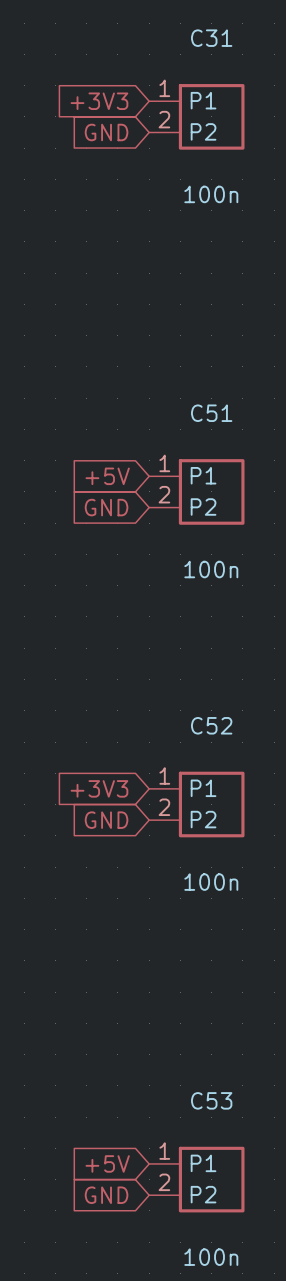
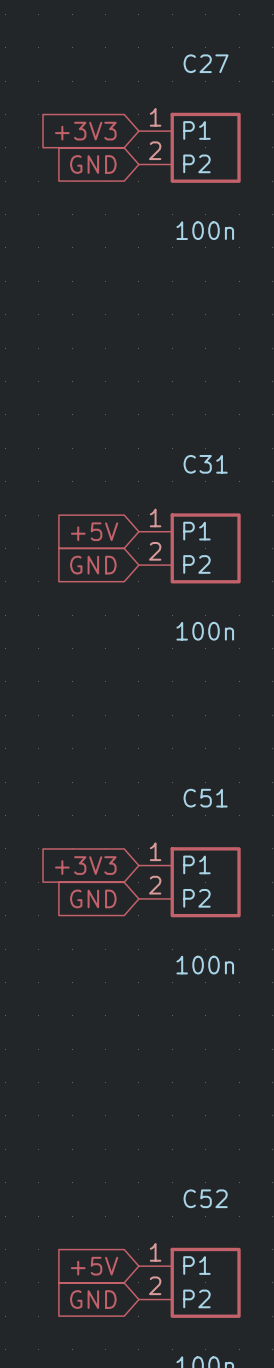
C31 name: C31 (211, 38) -> C27 (206, 63)
C51 name: C51 (211, 413) -> C31 (205, 464)
C52 name: C52 (211, 725) -> C51 (205, 798)
C53 name: C53 (211, 1100) -> C52 (205, 1198)

